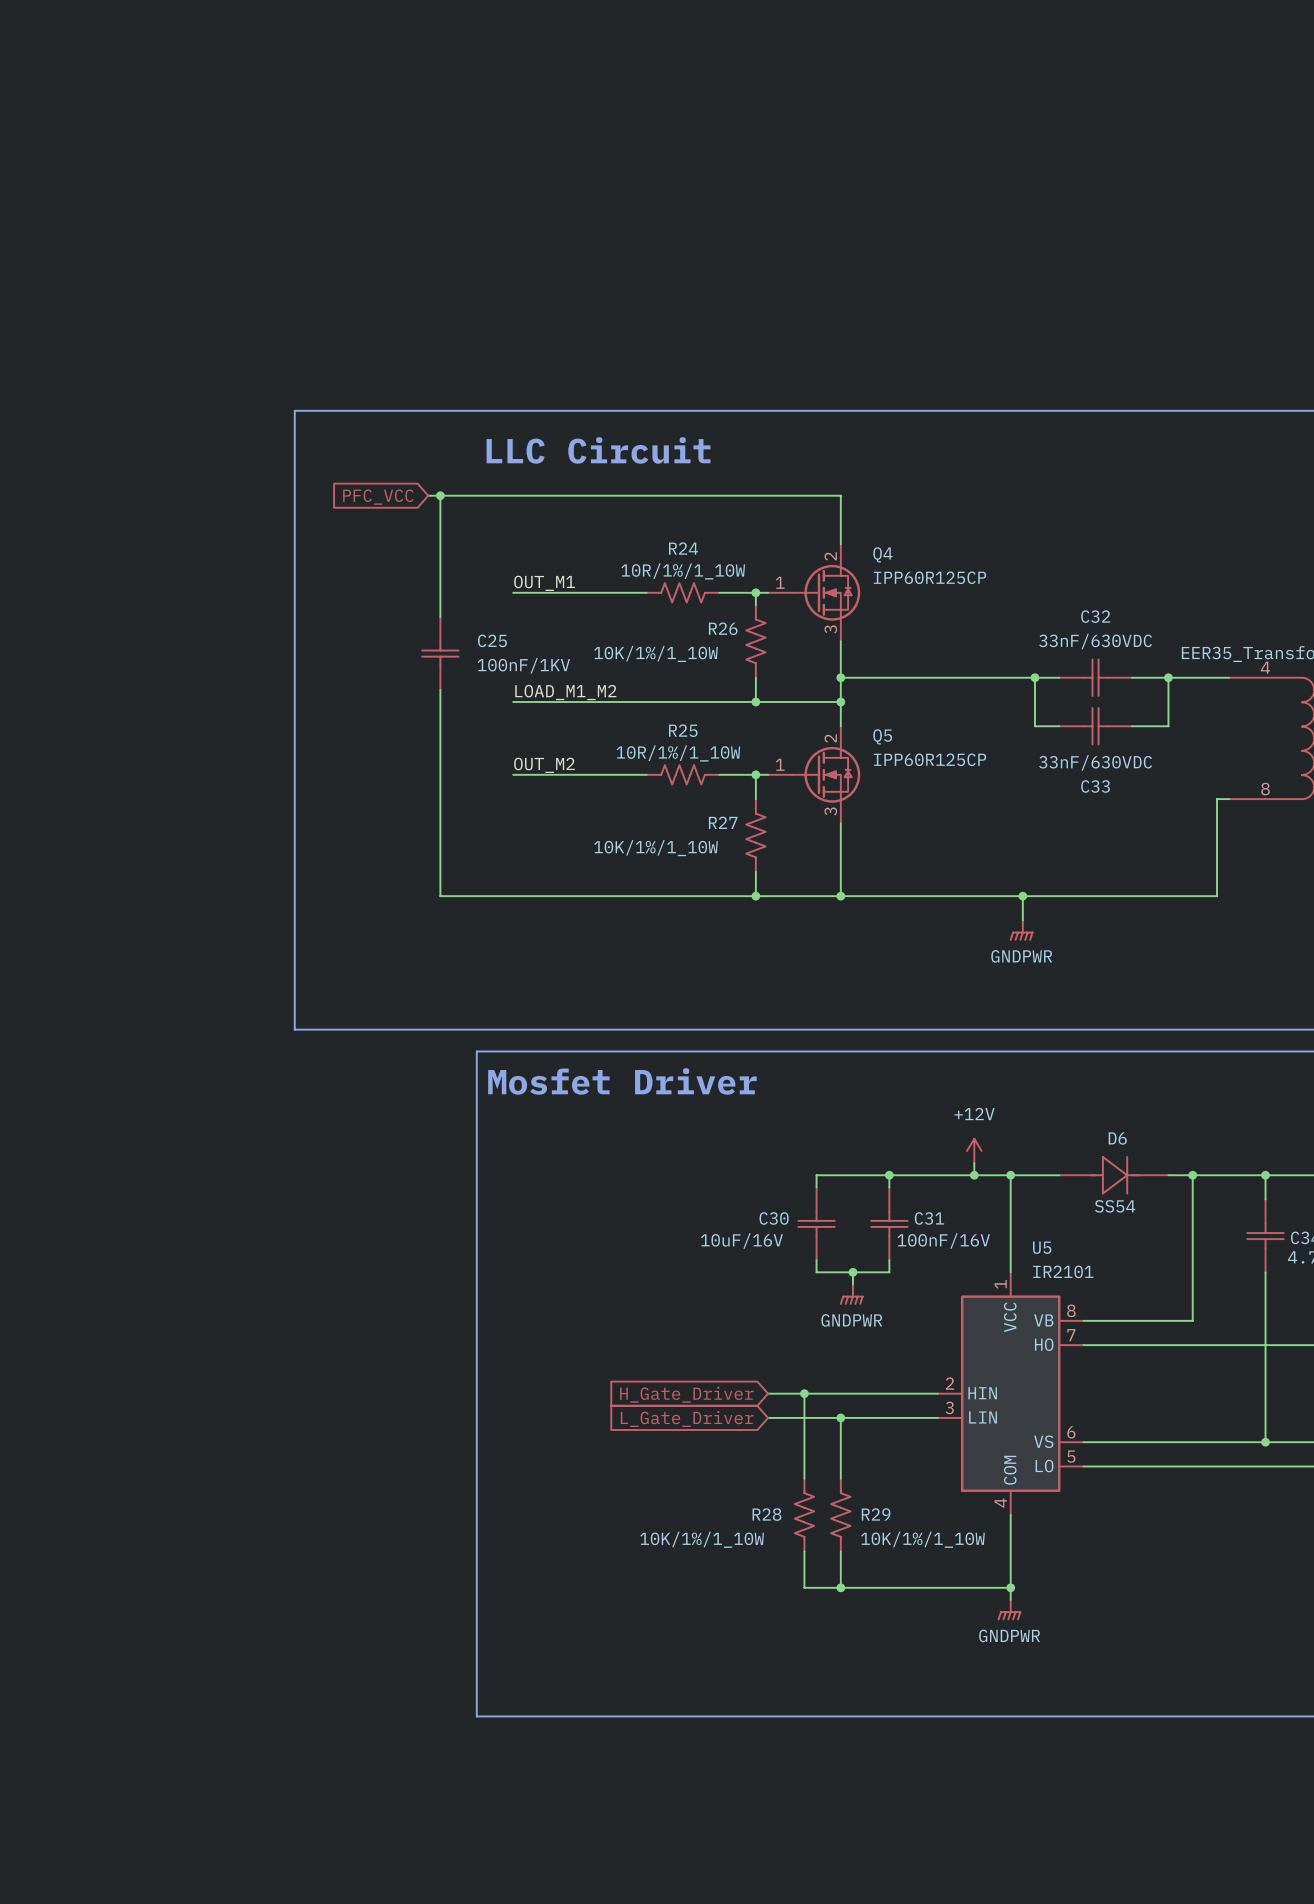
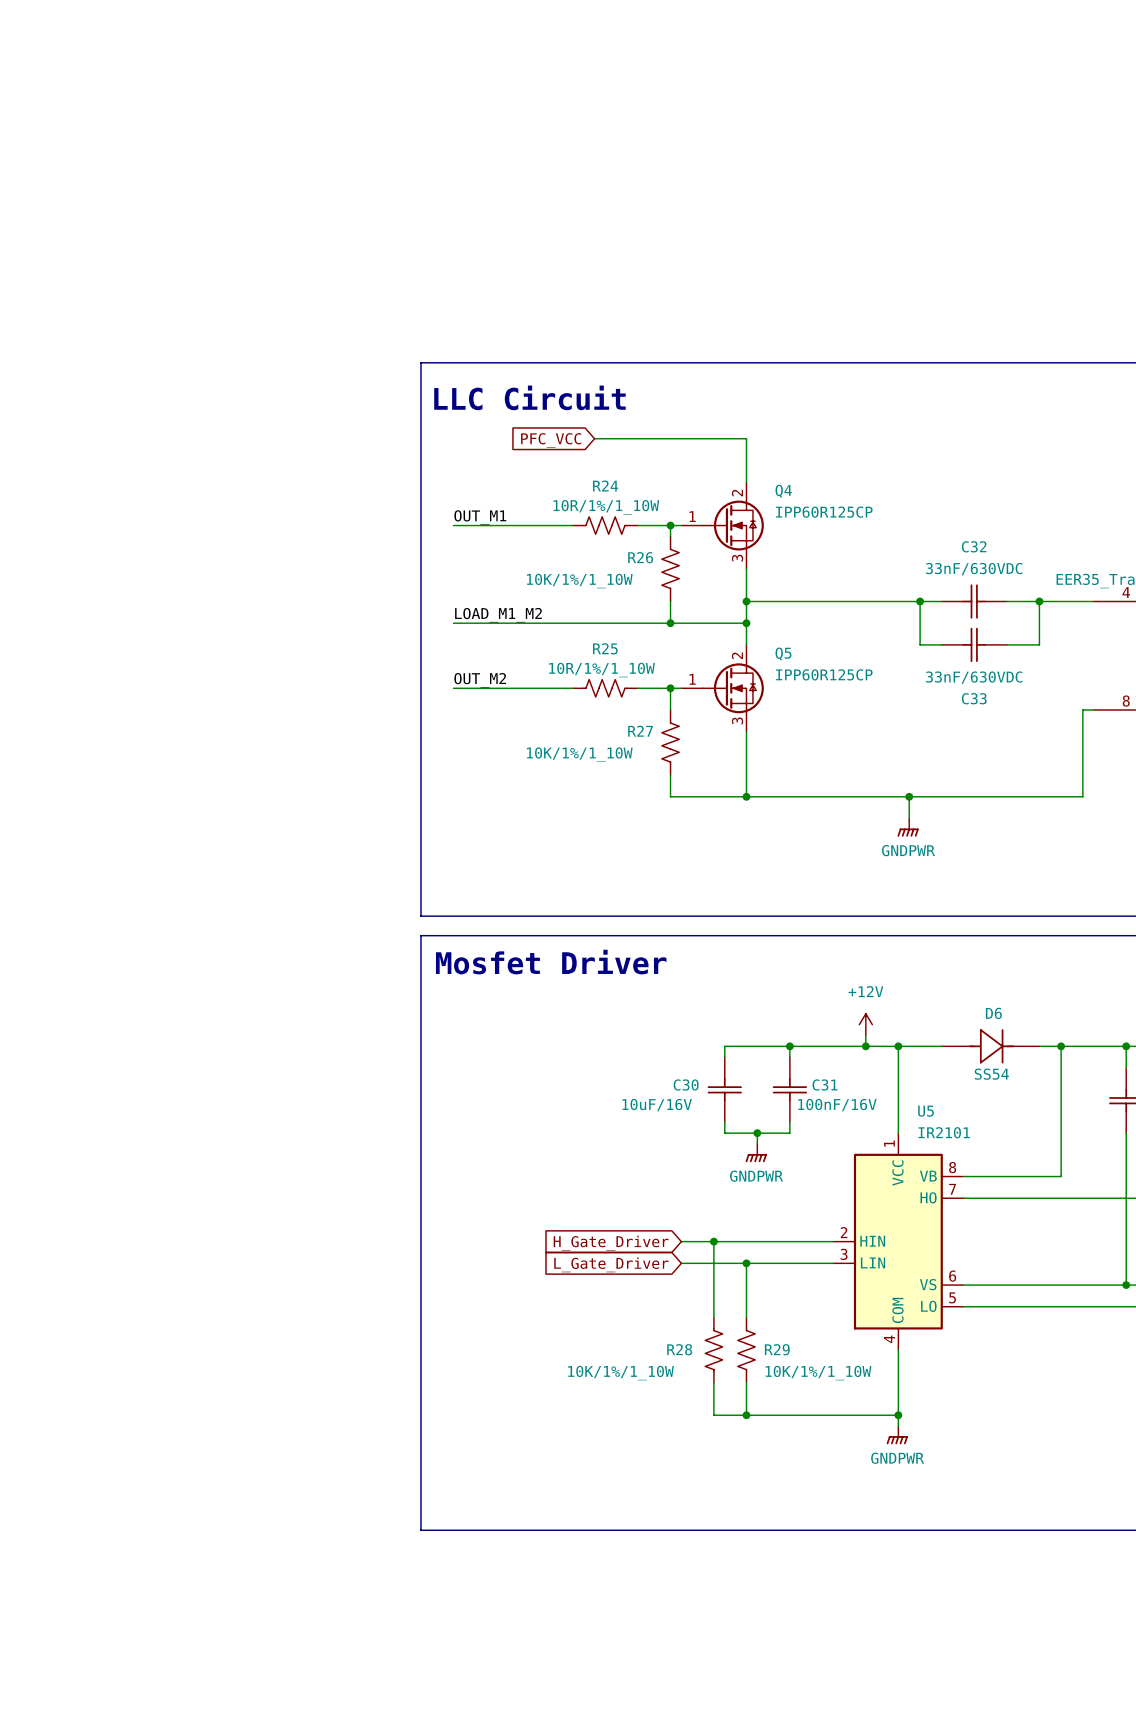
line: (476, 410) (294, 410) (294, 1029) (476, 1029) -> (420, 362) (420, 916)
wire: (428, 495) (670, 495) -> none
wire: (440, 495) (440, 617) -> none
junction: (440, 495) -> none
global label: PFC_VCC (378, 497) -> none
global label: none -> PFC_VCC (551, 440)
C25: 100nF/1KV (440, 653) -> none
wire: (440, 689) (440, 896) (755, 896) -> none
junction: (755, 896) -> none

